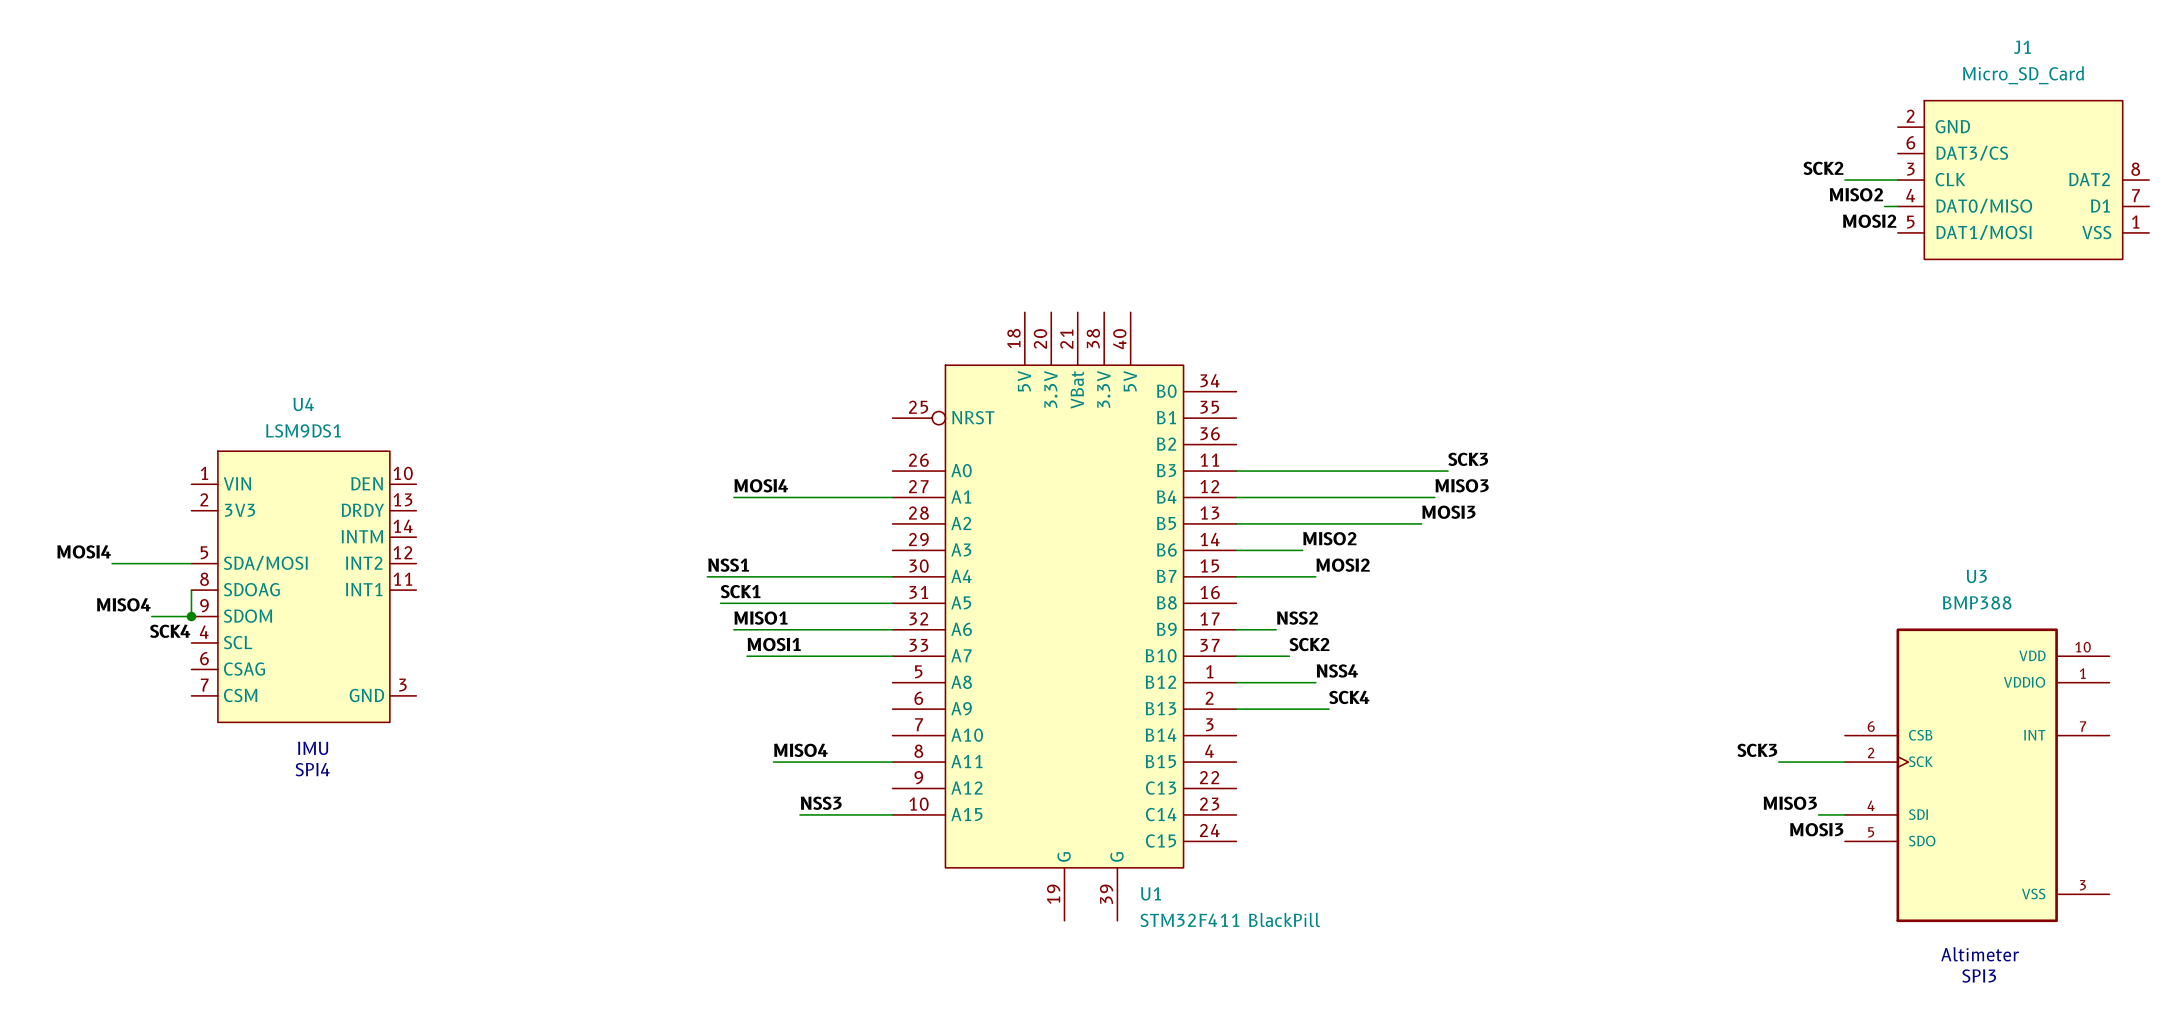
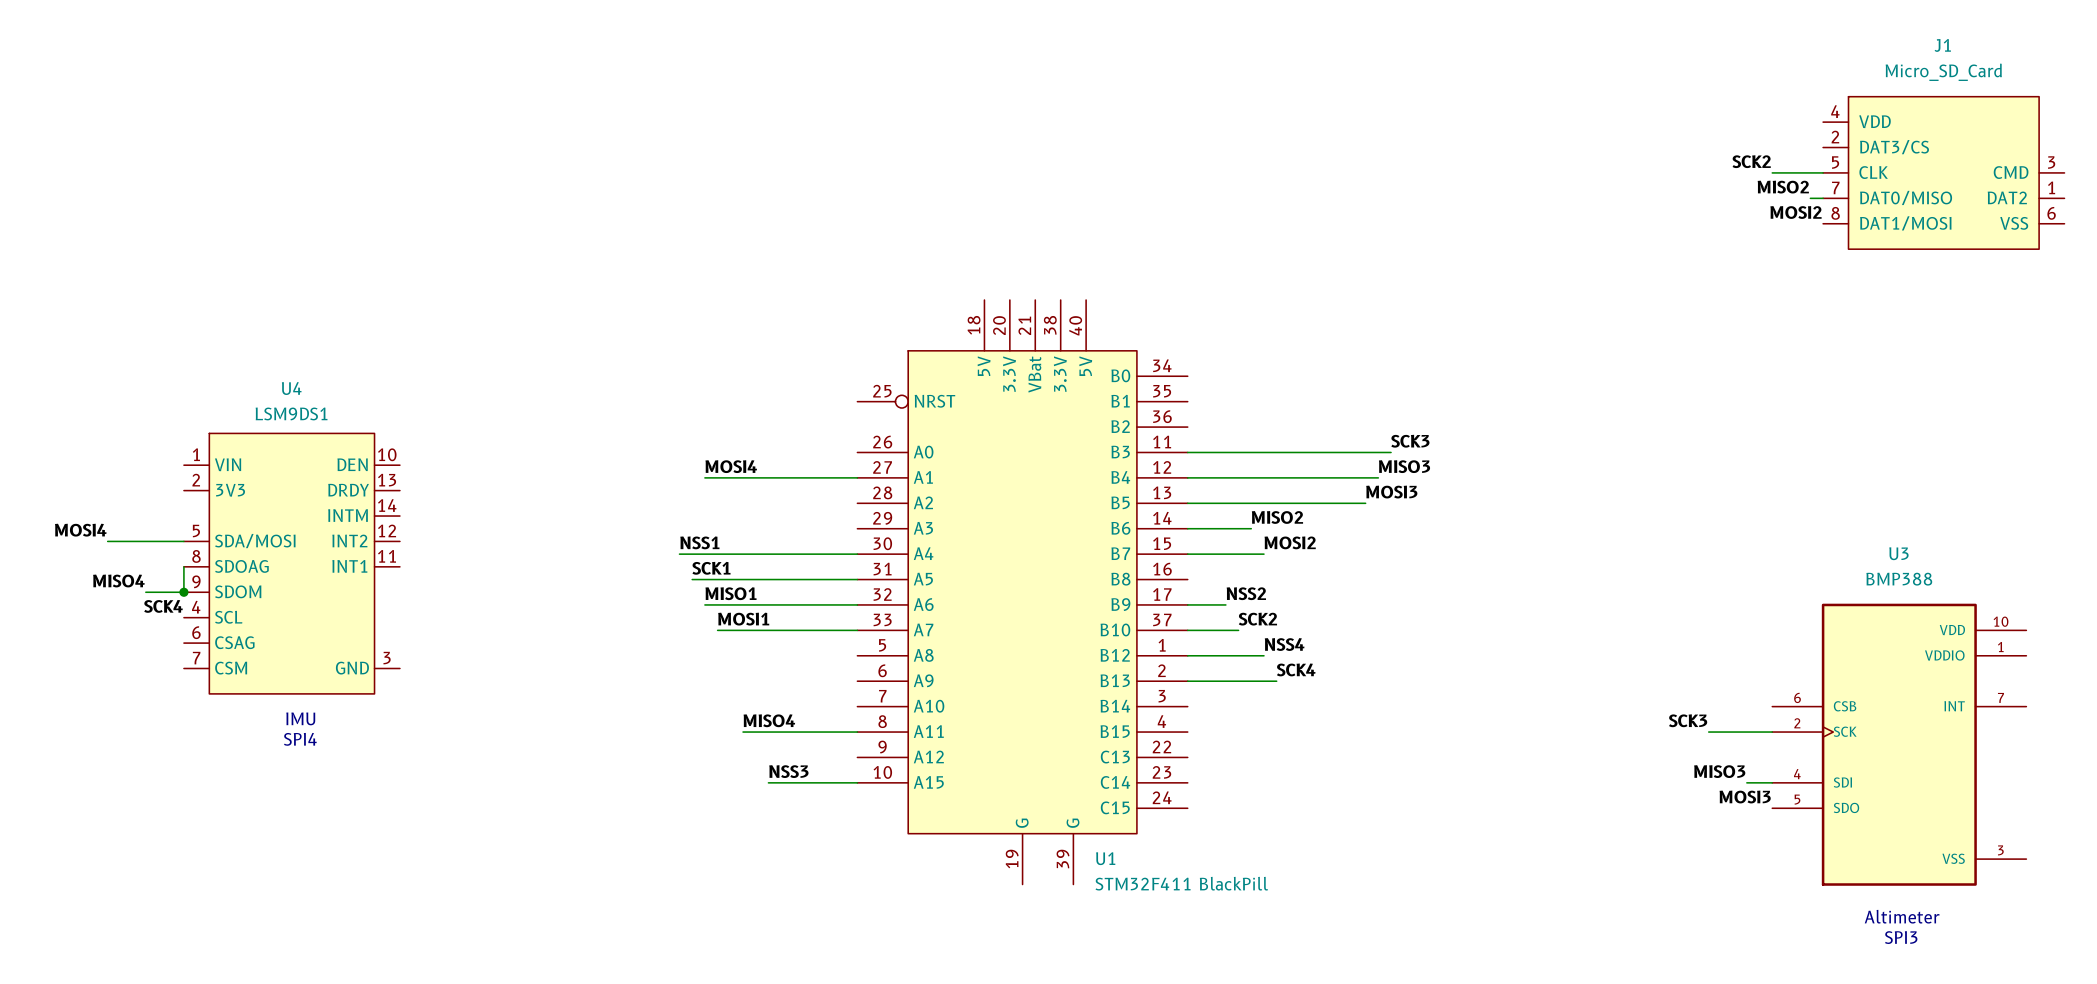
J1 symbol: [1897, 100, 2150, 260] -> [1823, 96, 2065, 250]

